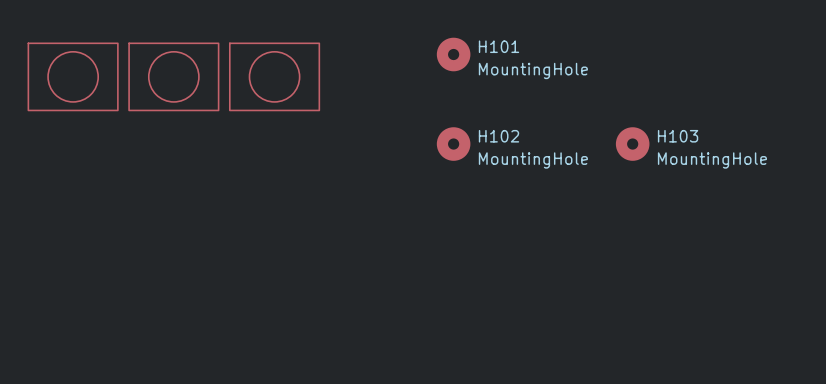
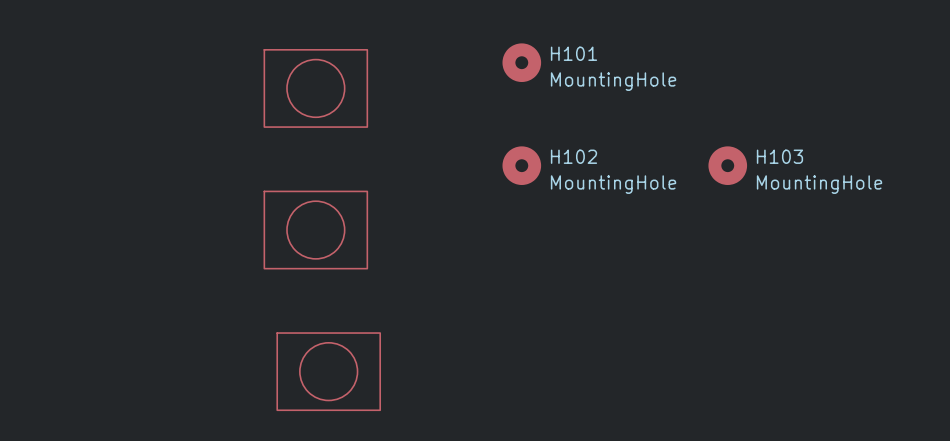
part: (73, 76) -> none
part: (173, 76) -> none
part: none -> (315, 230)
part: none -> (328, 371)

